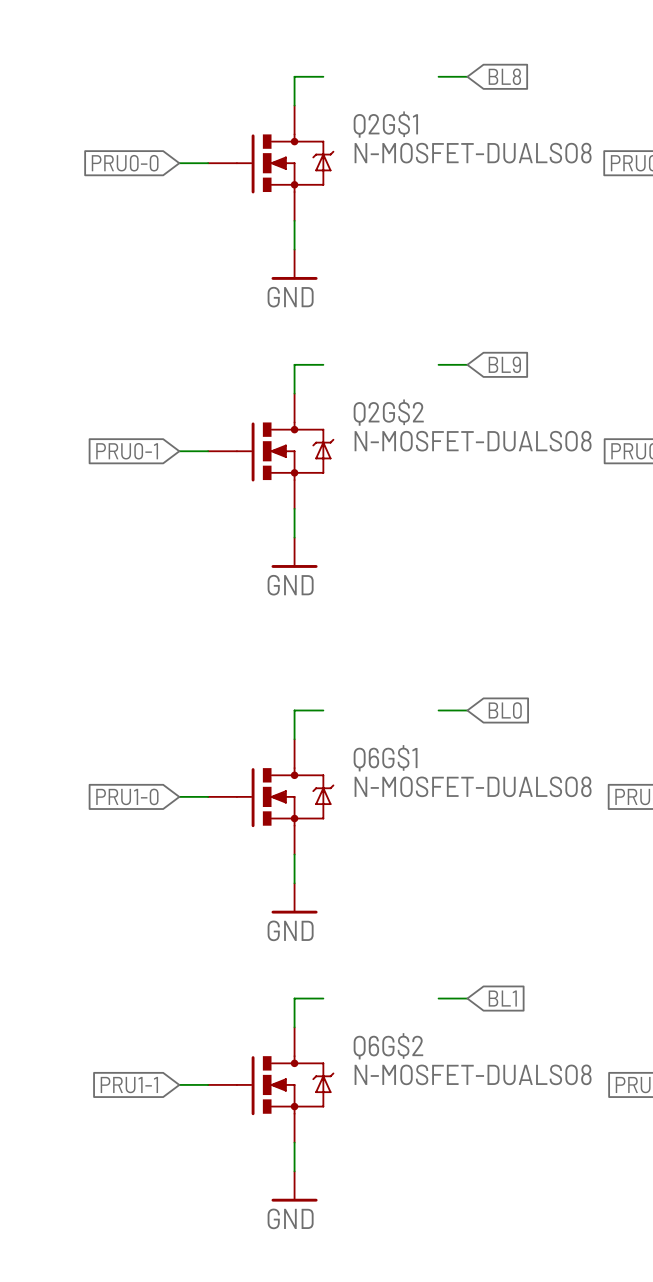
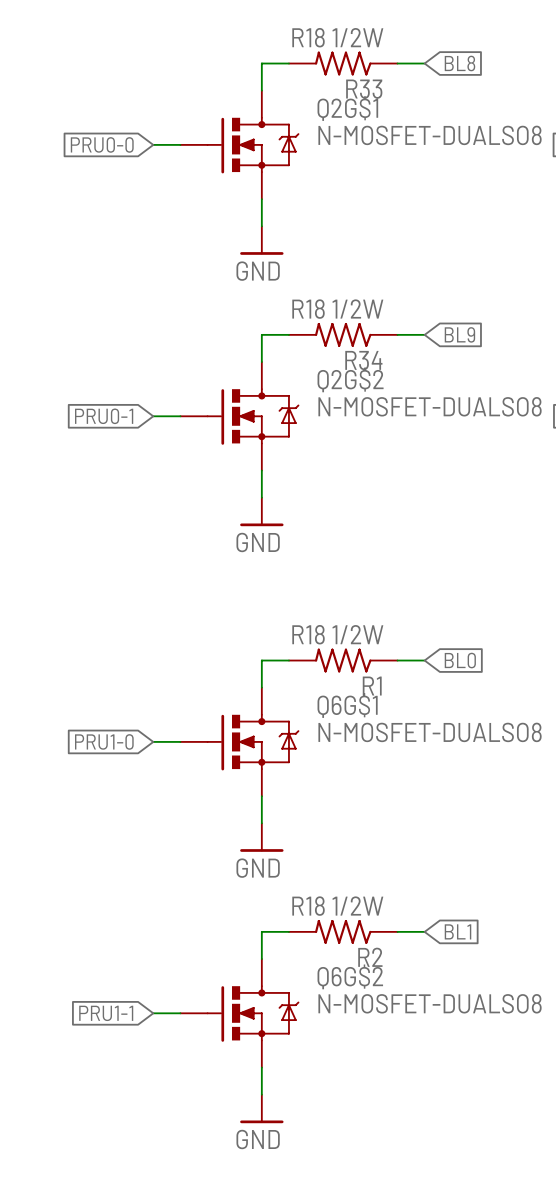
R33: none -> R18 1/2W (343, 63)
R34: none -> R18 1/2W (343, 334)
R1: none -> R18 1/2W (343, 660)
R2: none -> R18 1/2W (343, 931)

